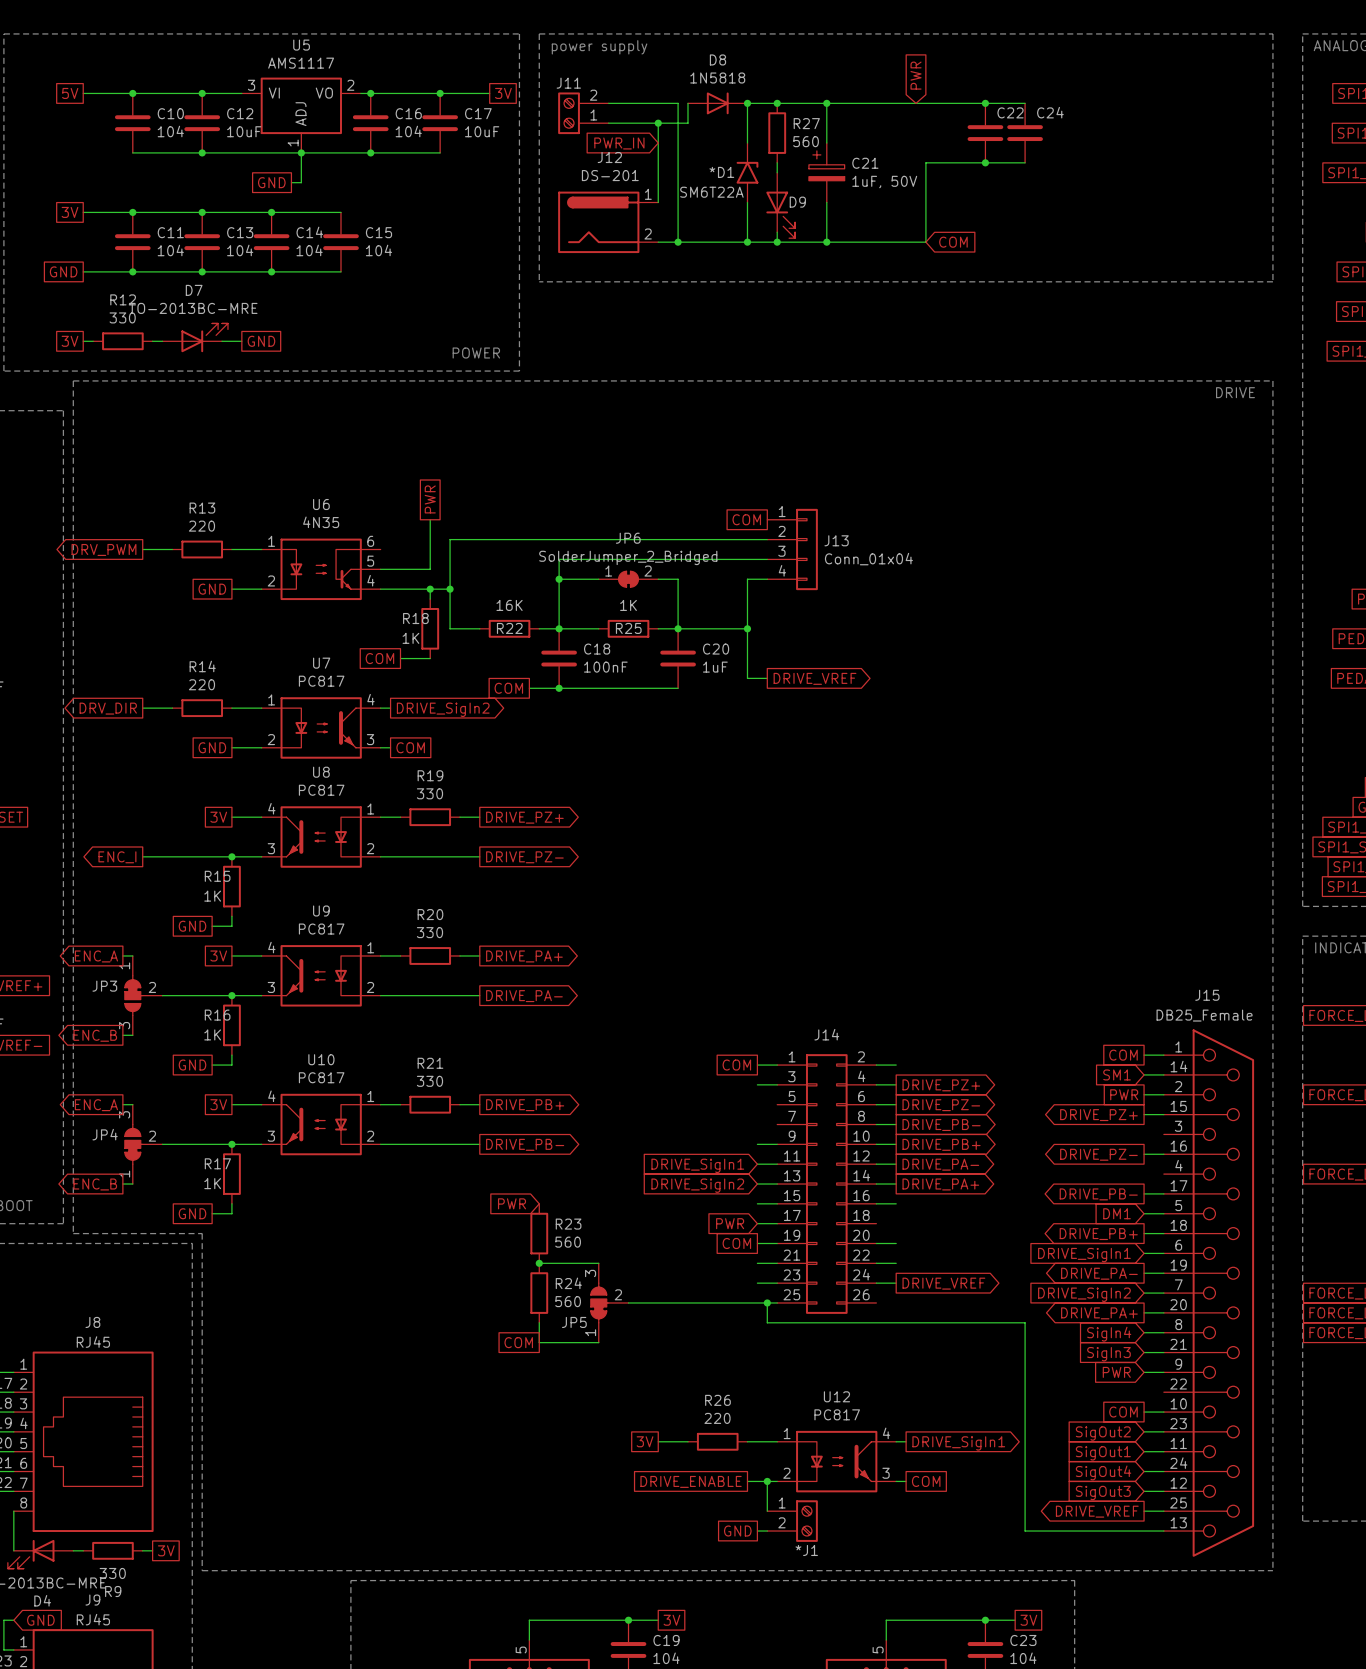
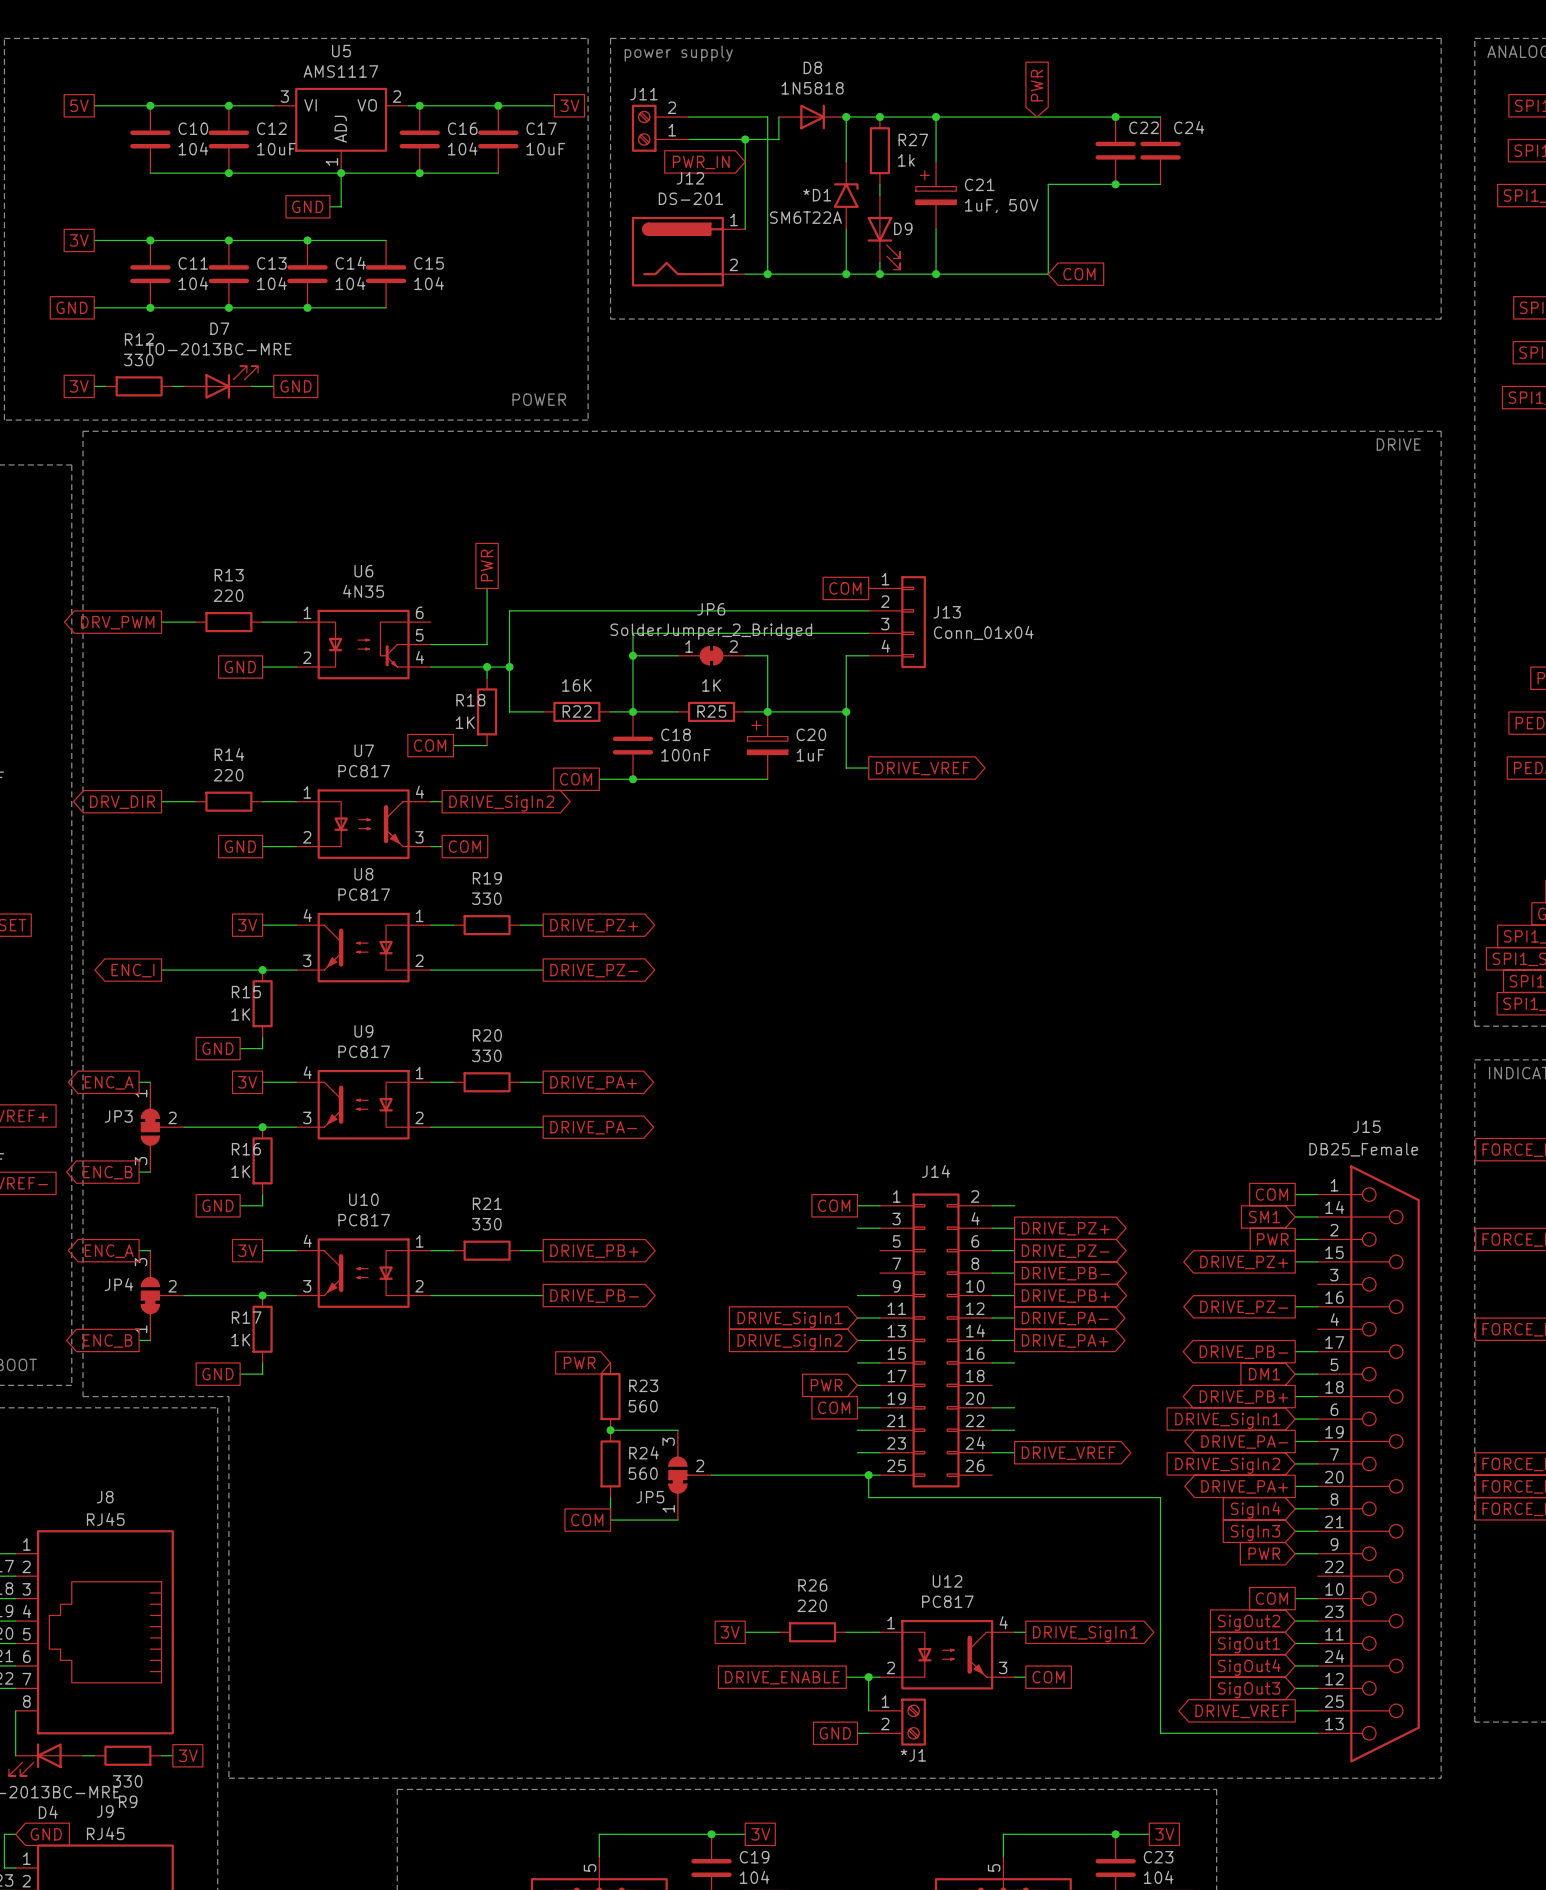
R27 value: 560 (806, 141) -> 1k (906, 160)
C20 symbol: [660, 628, 696, 689] -> [747, 711, 788, 780]

